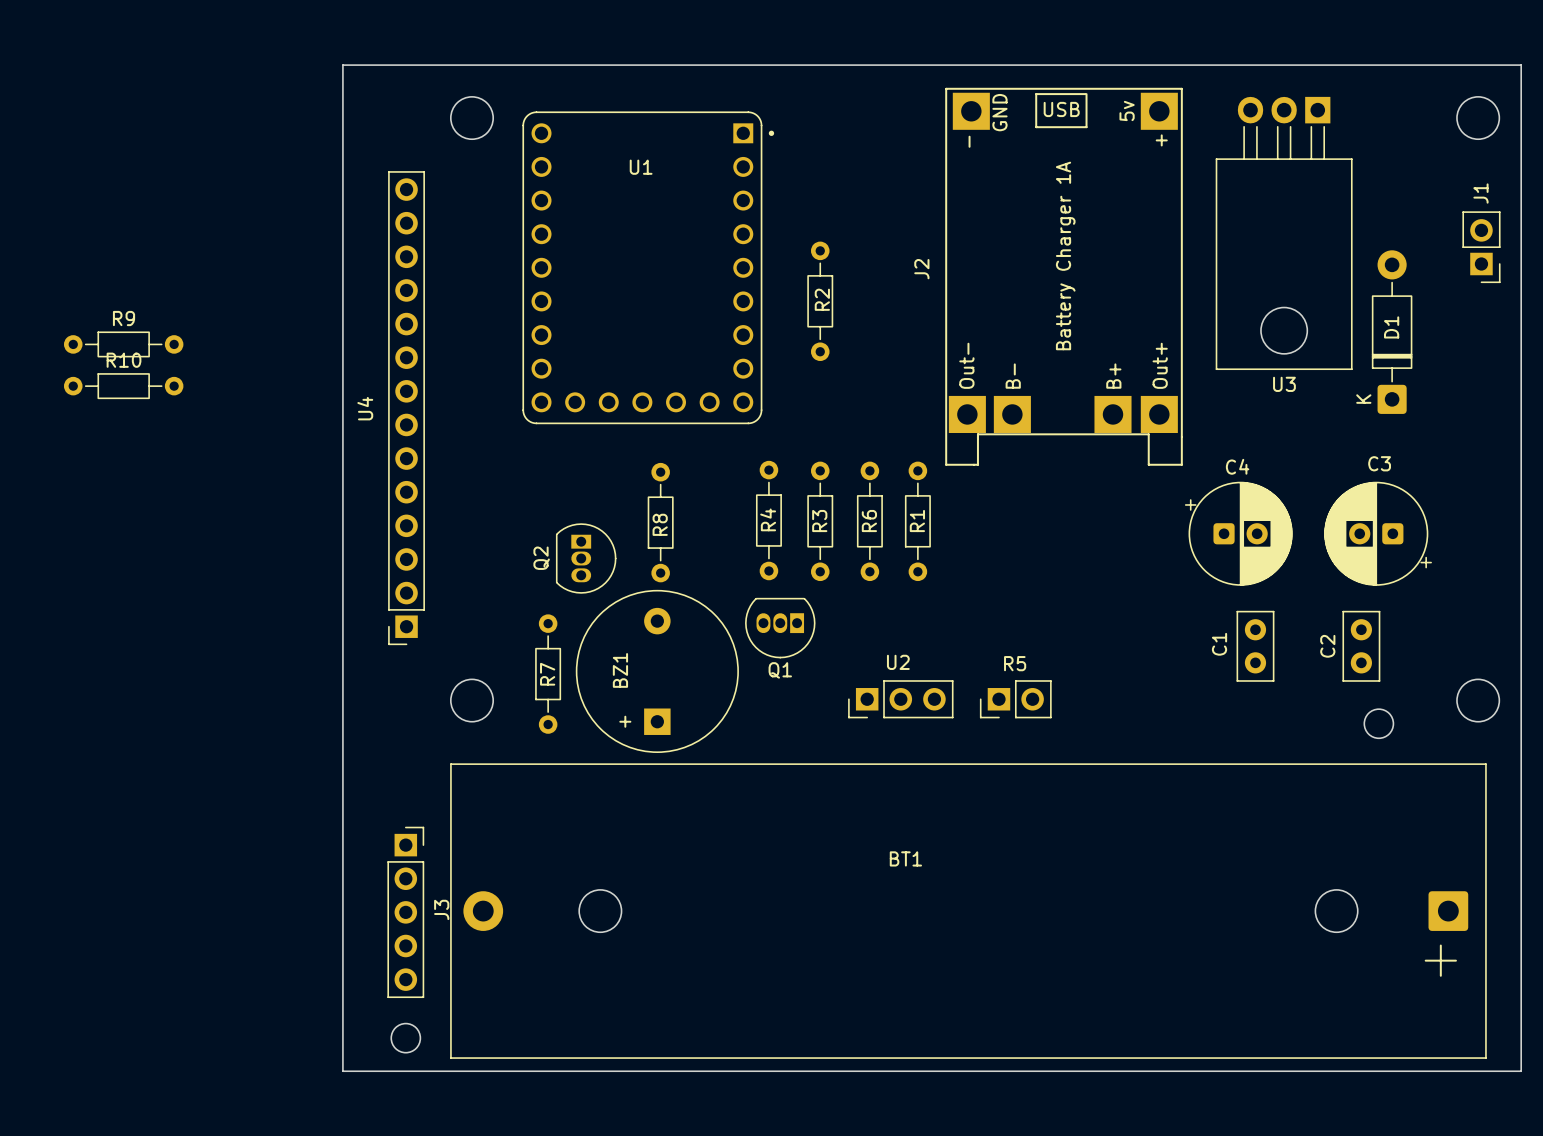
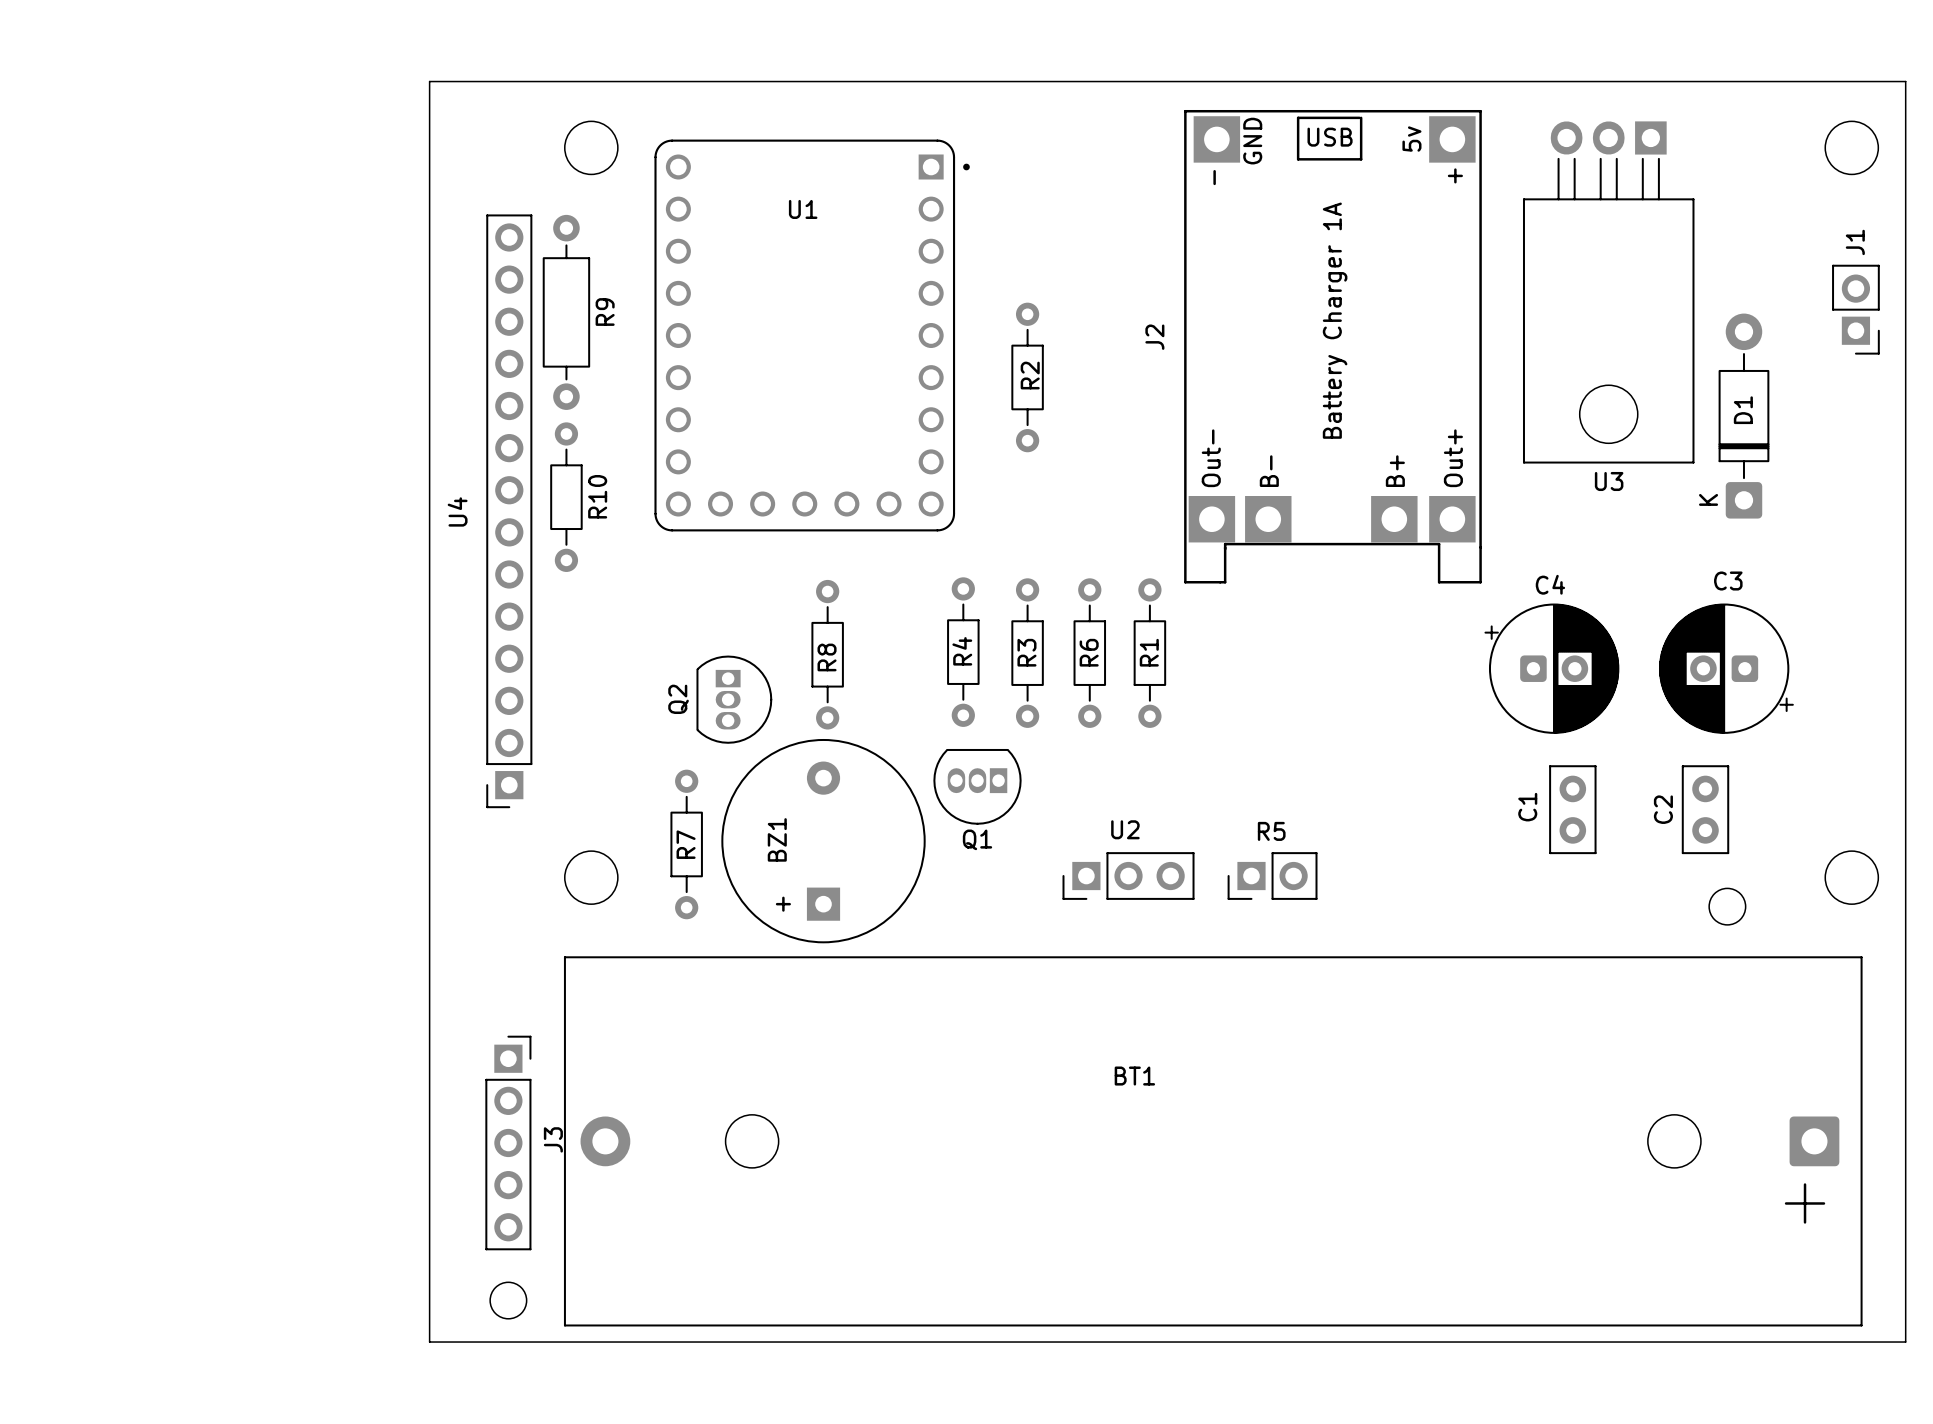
R9 name position: R9 (124, 318) -> R9 (605, 312)
R9 footprint: [63, 331, 184, 358] -> [542, 214, 591, 410]
R10 rotation: 0° (123, 386) -> 90° clockwise (566, 497)
R10 position: (123, 386) -> (566, 497)

